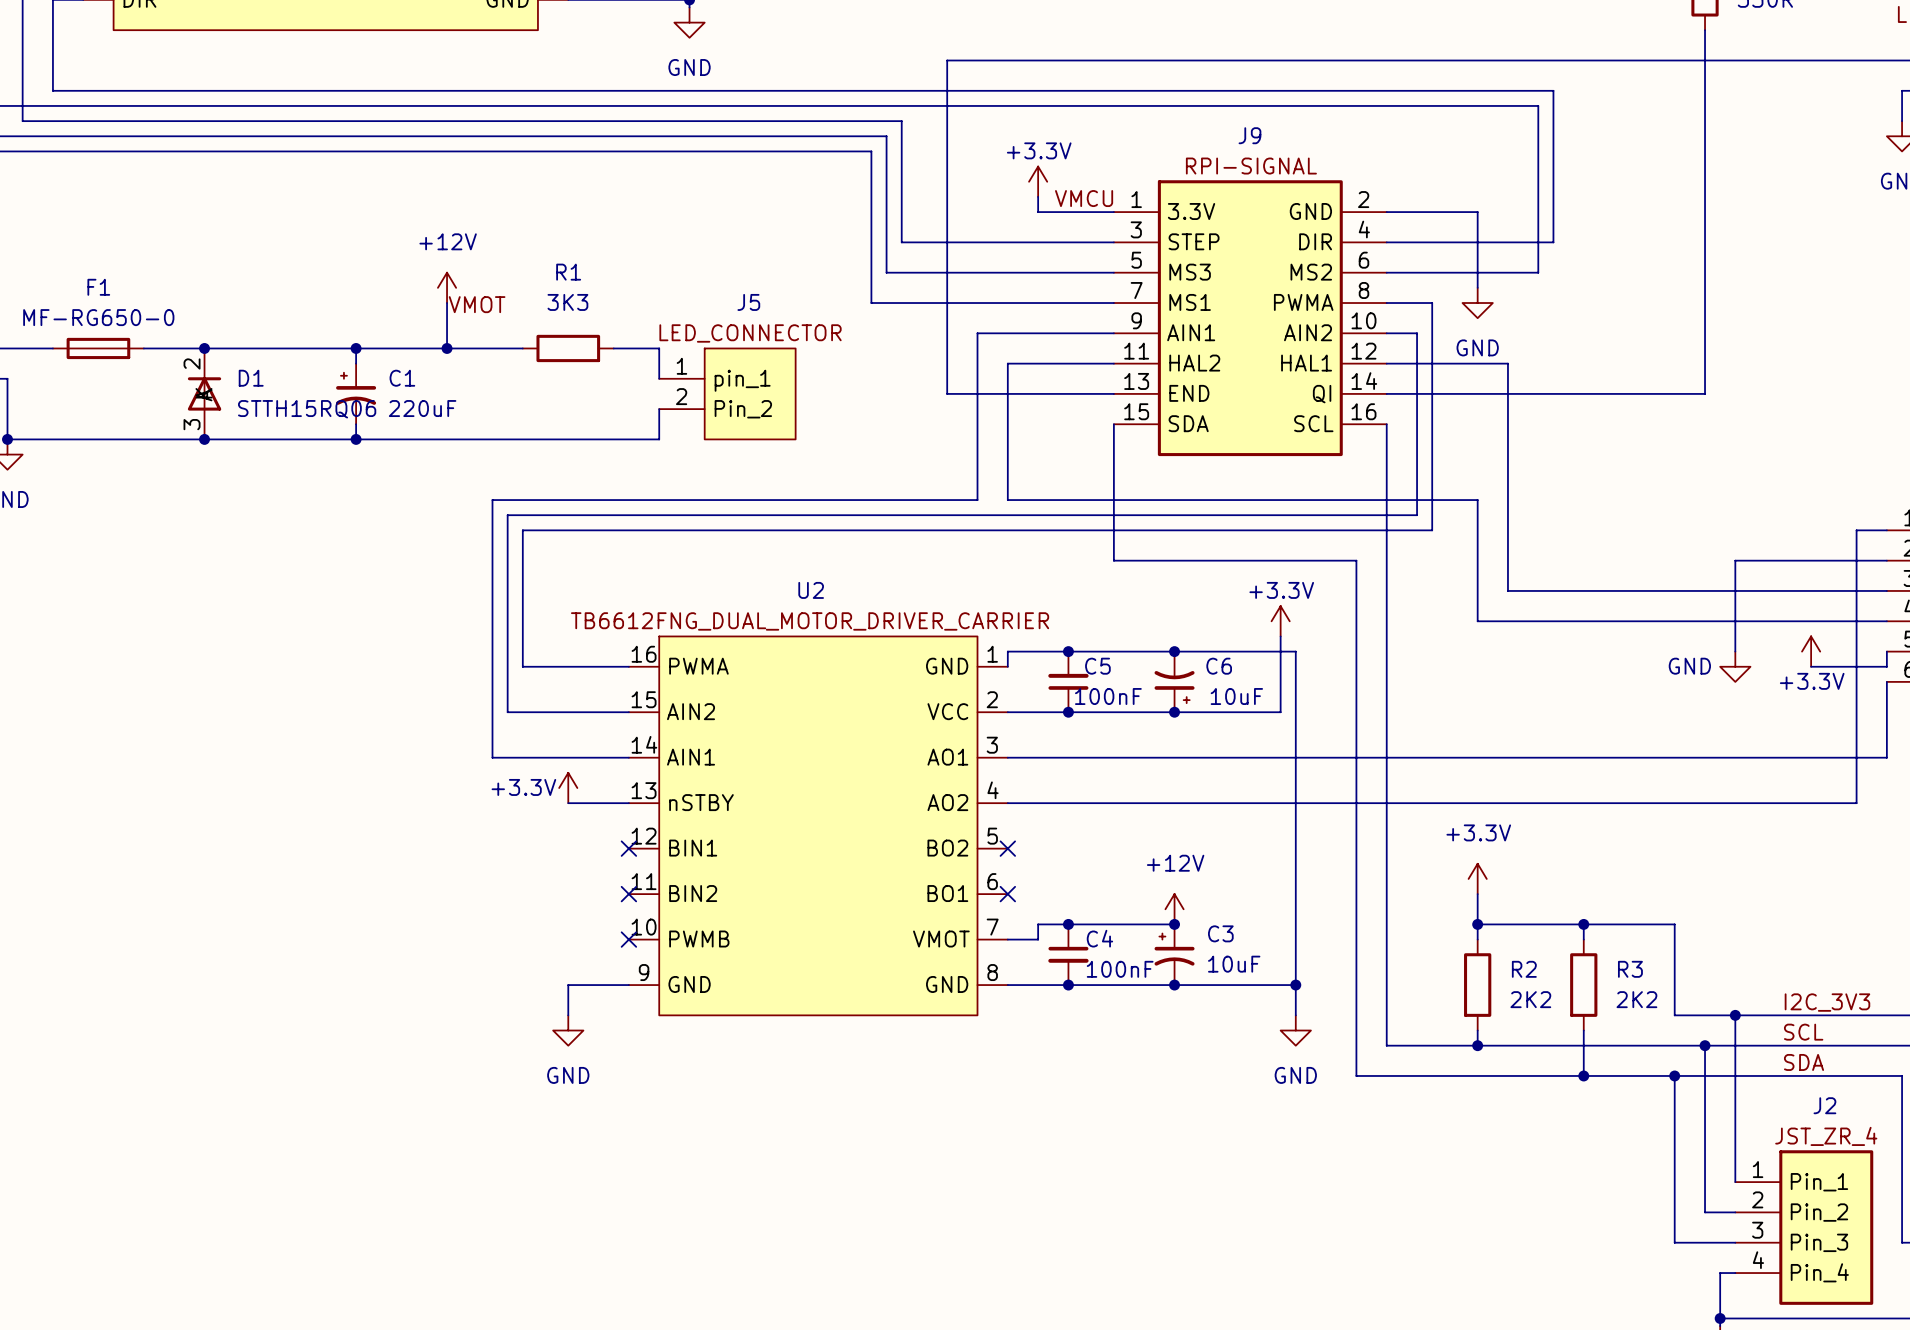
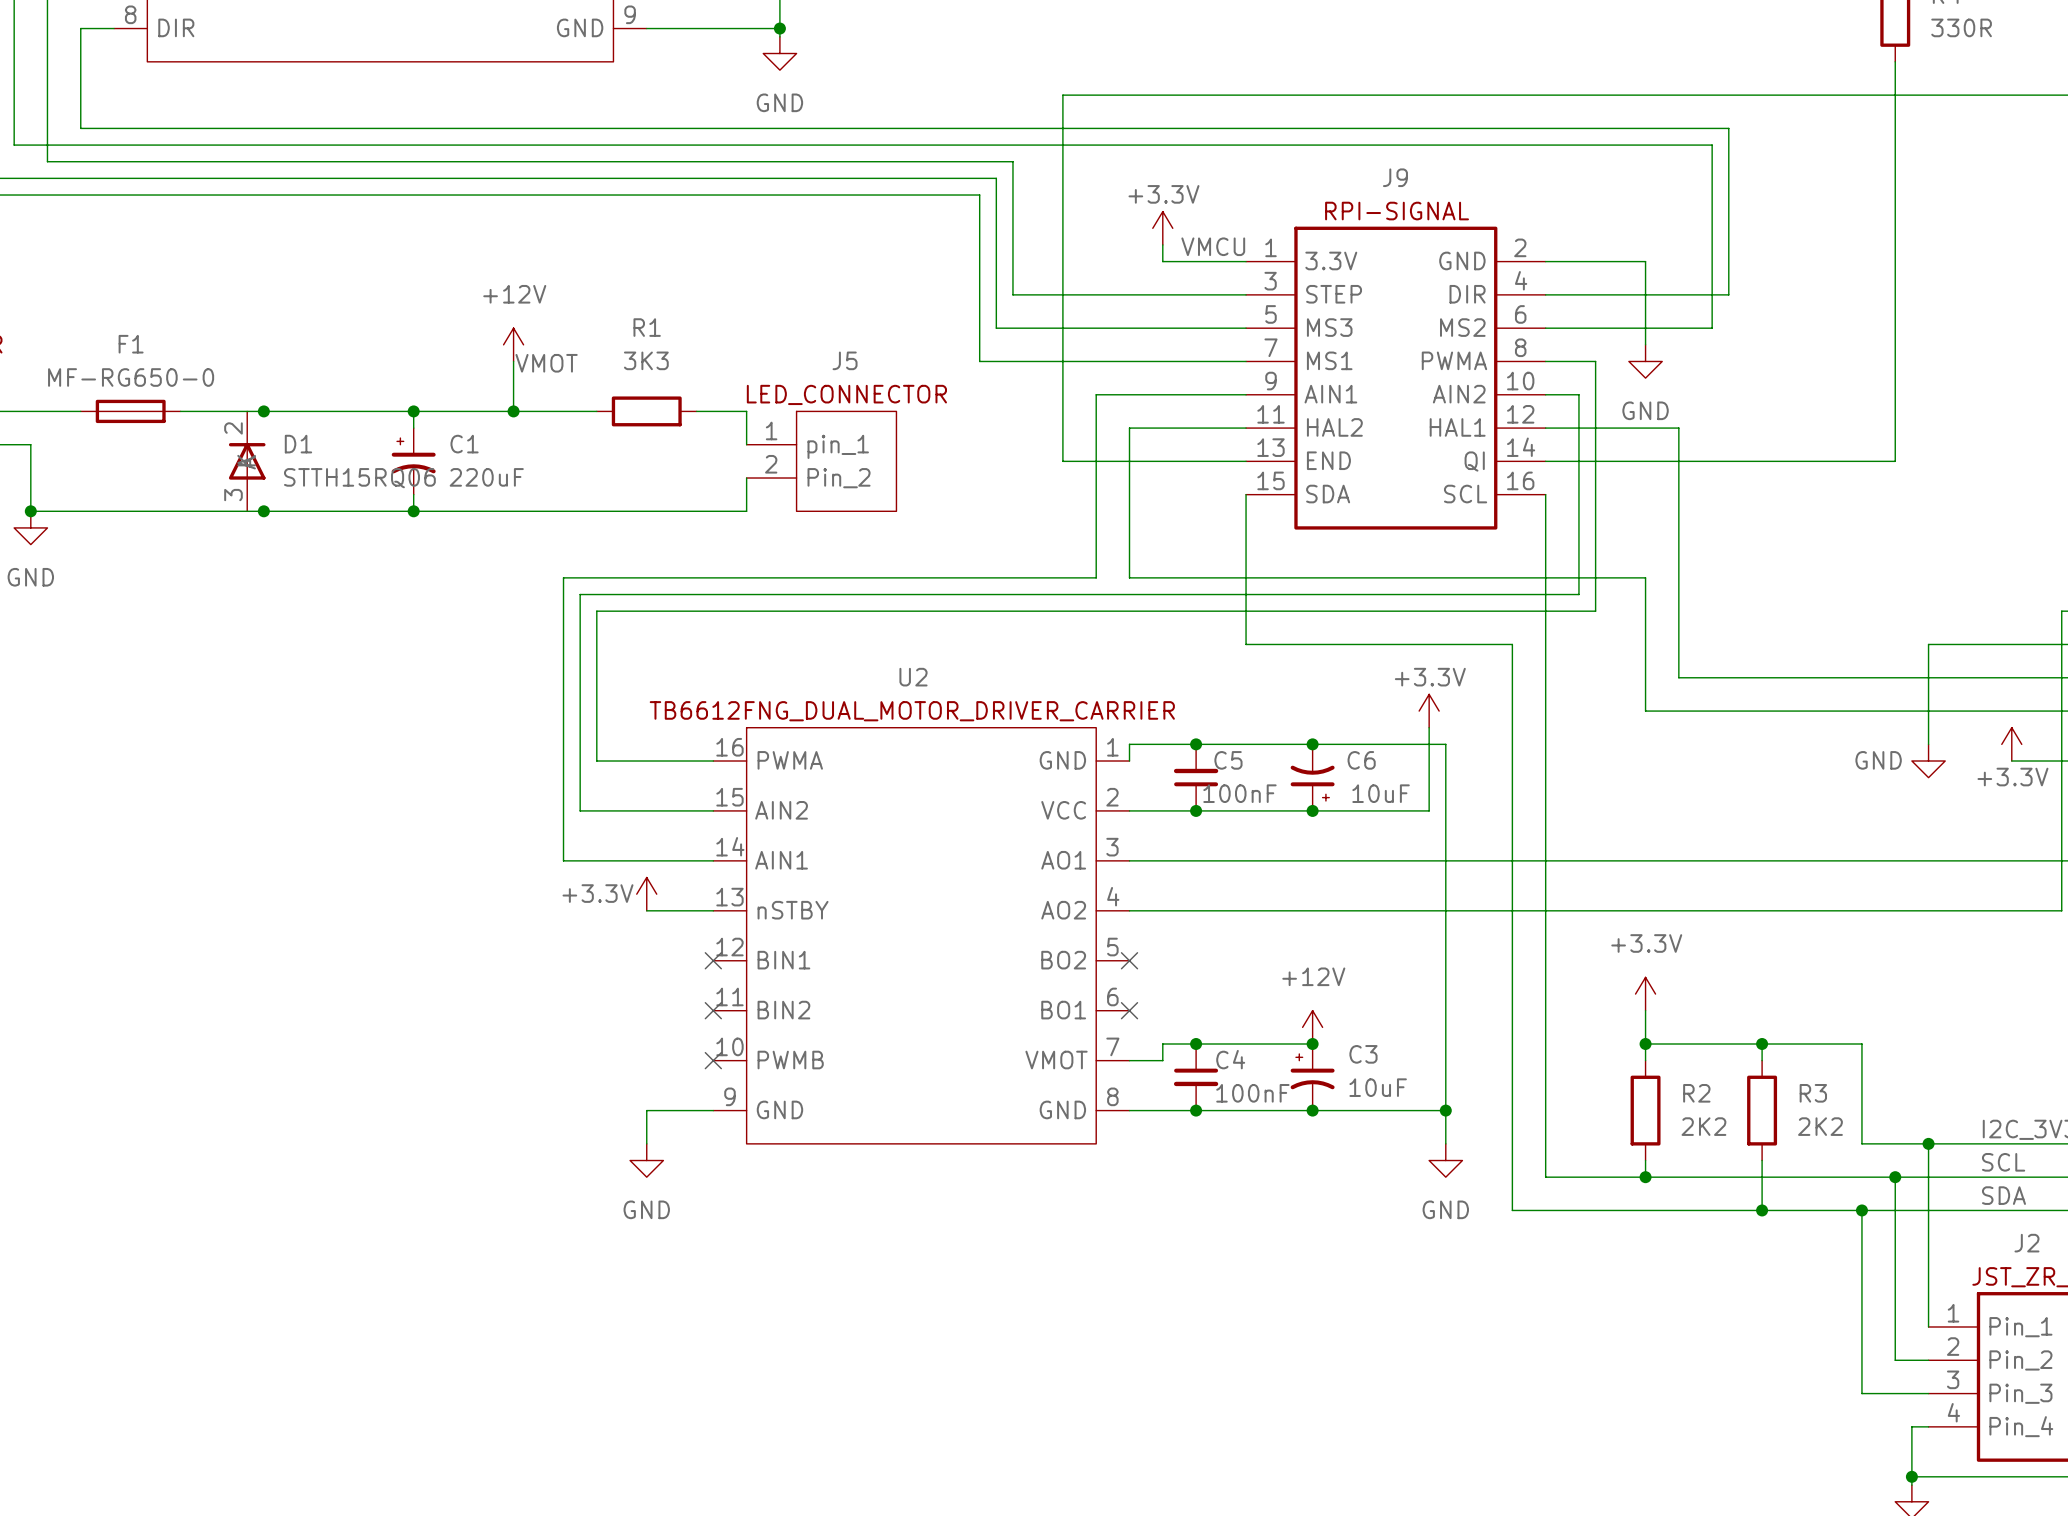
junction position: (204, 348) -> (263, 411)
junction position: (204, 439) -> (263, 511)

